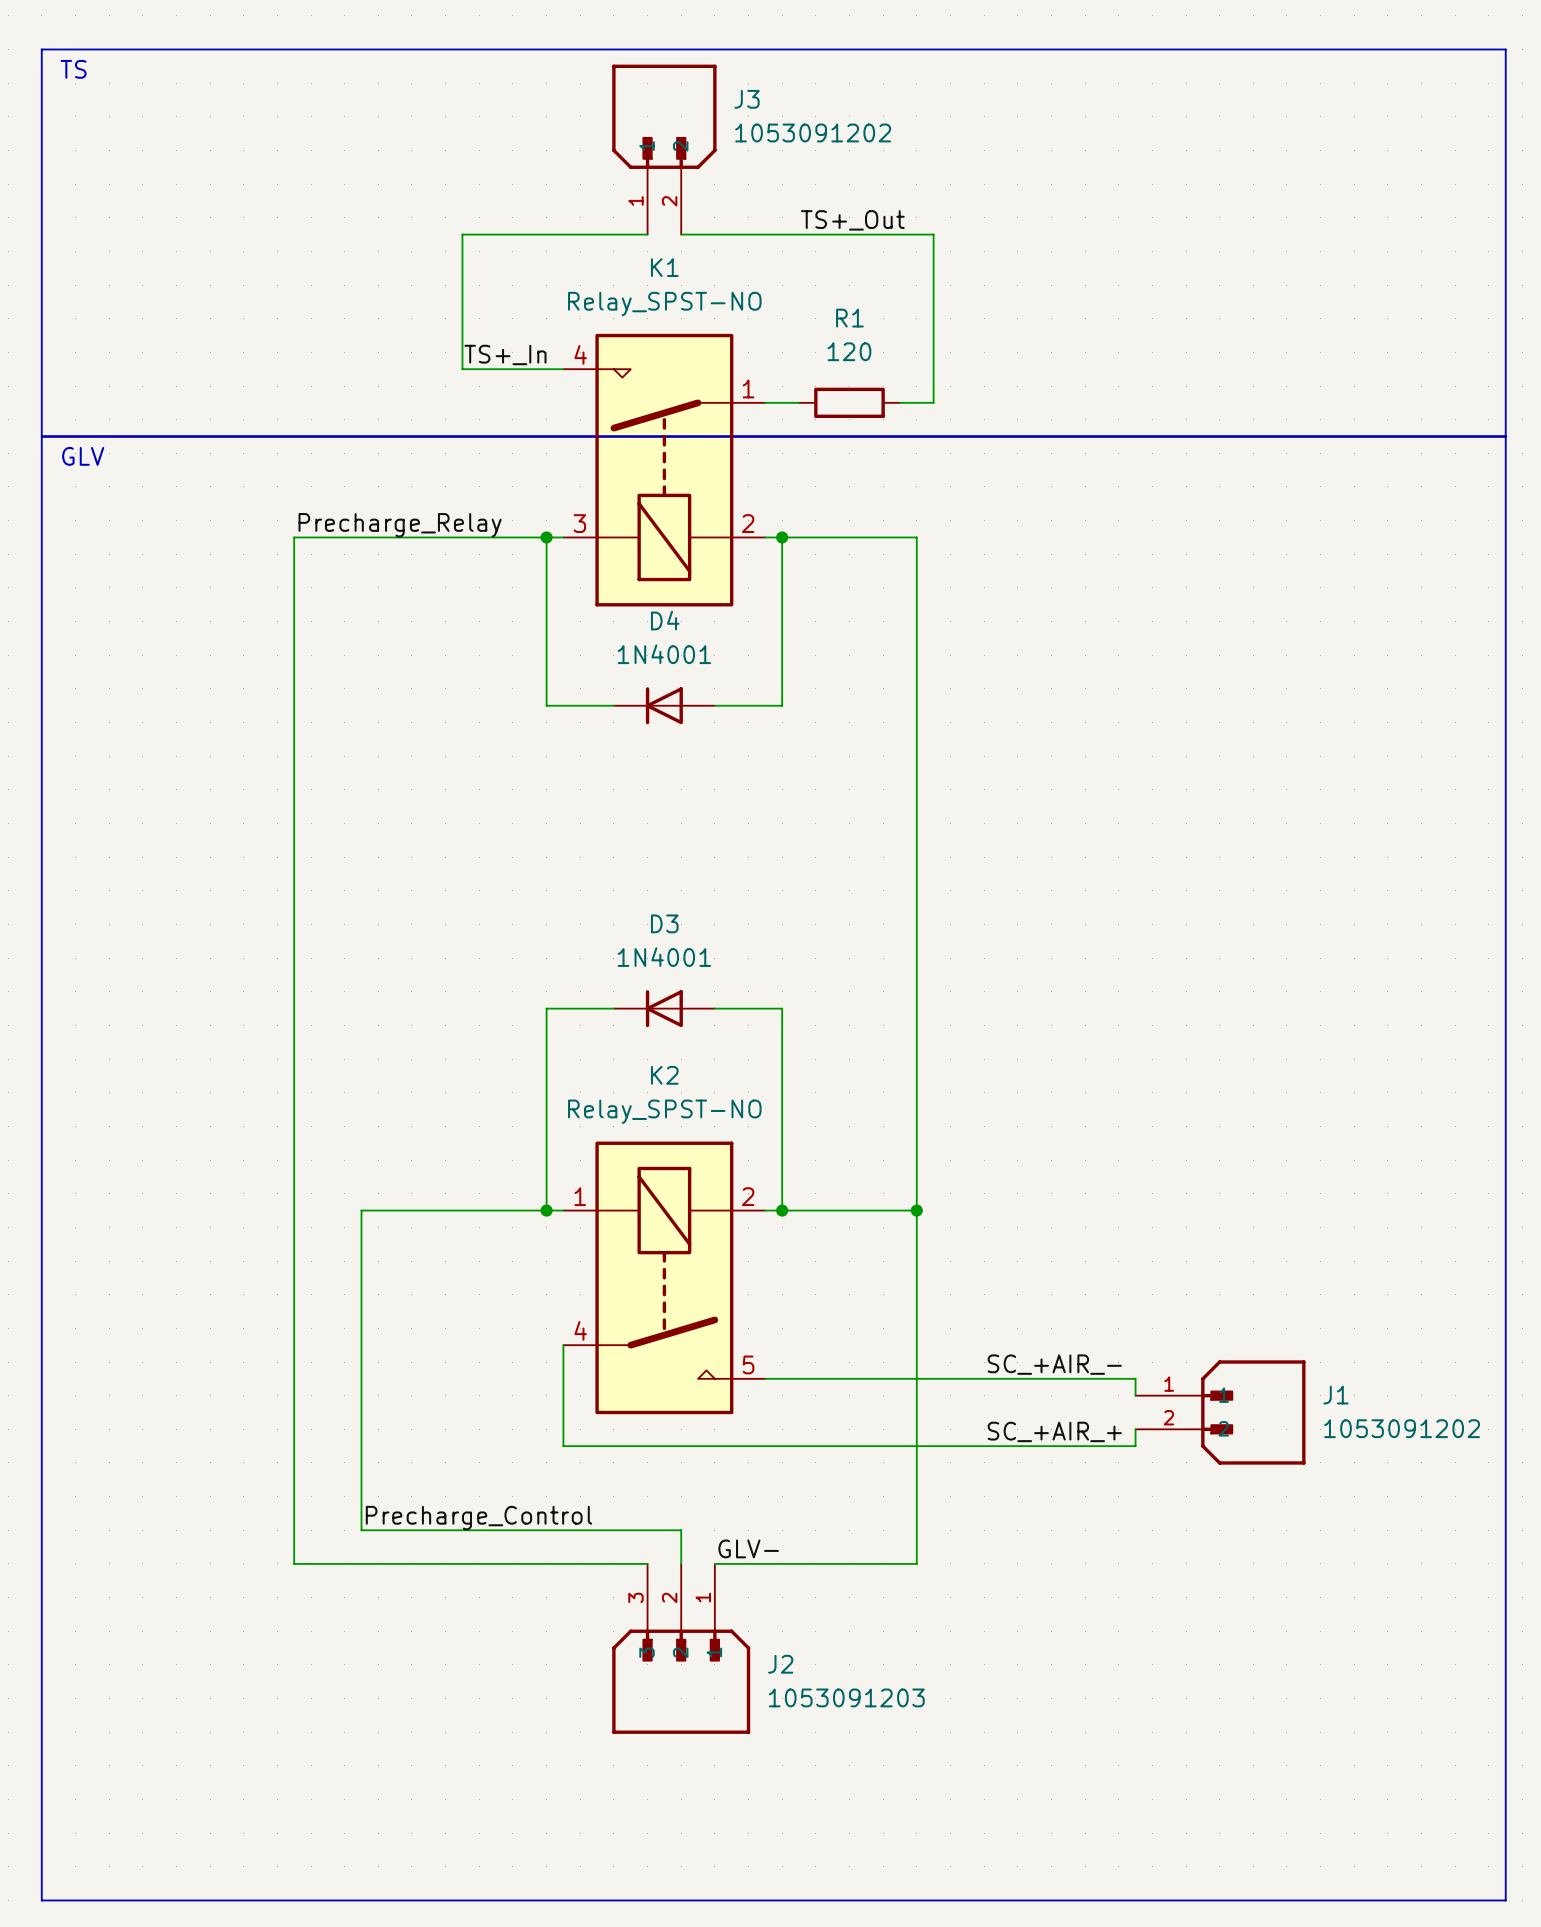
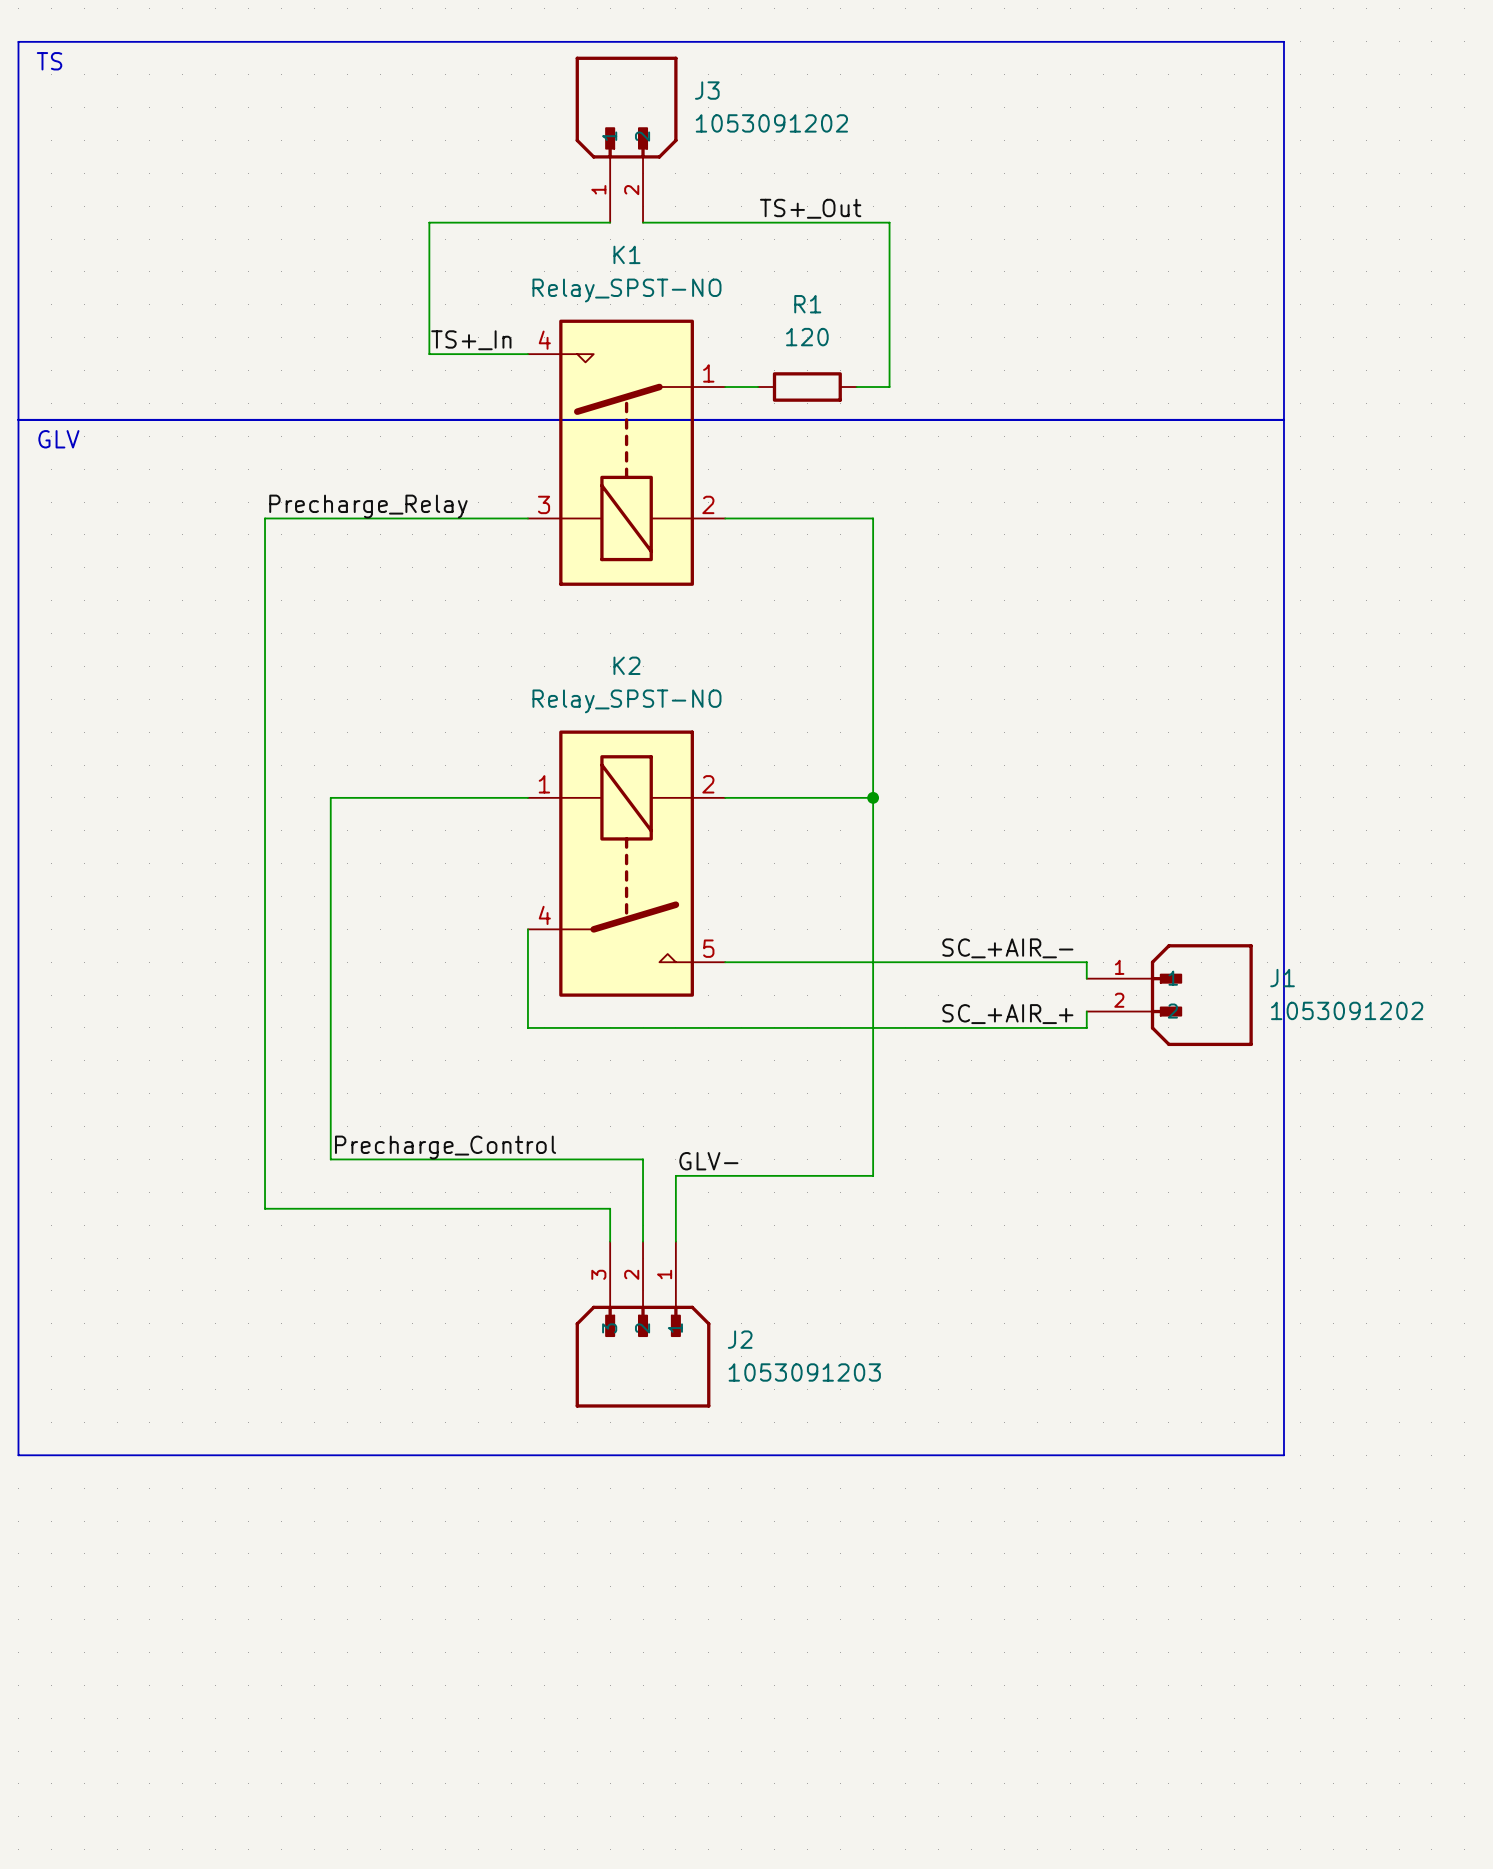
line: (1337, 49) (1505, 49) (1505, 1900) (41, 1900) (41, 1496) -> (1283, 41) (1283, 1455) (18, 1455)
line: (1337, 436) (1505, 436) -> none
wire: (546, 537) (546, 705) (613, 705) -> none
junction: (546, 537) -> none
wire: (782, 537) (782, 705) (714, 705) -> none
junction: (782, 537) -> none
D4: 1N4001 (664, 705) -> none
wire: none -> (527, 797) (330, 797) (330, 1159) (643, 1159) (643, 1241)
wire: none -> (725, 797) (873, 797)
junction: none -> (873, 797)
wire: none -> (527, 929) (527, 1027) (1086, 1027) (1086, 1011)
label: none -> SC_+AIR_- (1007, 948)
wire: none -> (725, 962) (1086, 962) (1086, 978)
wire: (613, 1008) (546, 1008) (546, 1210) -> none
D3: 1N4001 (664, 1008) -> none
wire: (714, 1008) (782, 1008) (782, 1210) -> none
label: none -> SC_+AIR_+ (1007, 1014)
label: none -> Precharge_Control (445, 1147)
label: none -> GLV- (708, 1161)
junction: (546, 1210) -> none
wire: (563, 1210) (361, 1210) (361, 1530) (681, 1530) (681, 1563) -> none
junction: (782, 1210) -> none
wire: (916, 1210) (916, 1563) (714, 1563) -> none
junction: (916, 1210) -> none
wire: (294, 1244) (294, 1563) (647, 1563) -> (265, 1208) (610, 1208) (610, 1241)
K2 position: (664, 1277) -> (626, 863)
wire: (563, 1345) (563, 1446) (1135, 1446) (1135, 1429) -> none
label: SC_+AIR_- (1054, 1364) -> none
wire: (765, 1378) (1135, 1378) (1135, 1395) -> none
J1 position: (1220, 1412) -> (1169, 995)
label: SC_+AIR_+ (1054, 1431) -> none
label: Precharge_Control (479, 1518) -> none
label: GLV- (748, 1548) -> none
J2 position: (681, 1648) -> (643, 1324)

